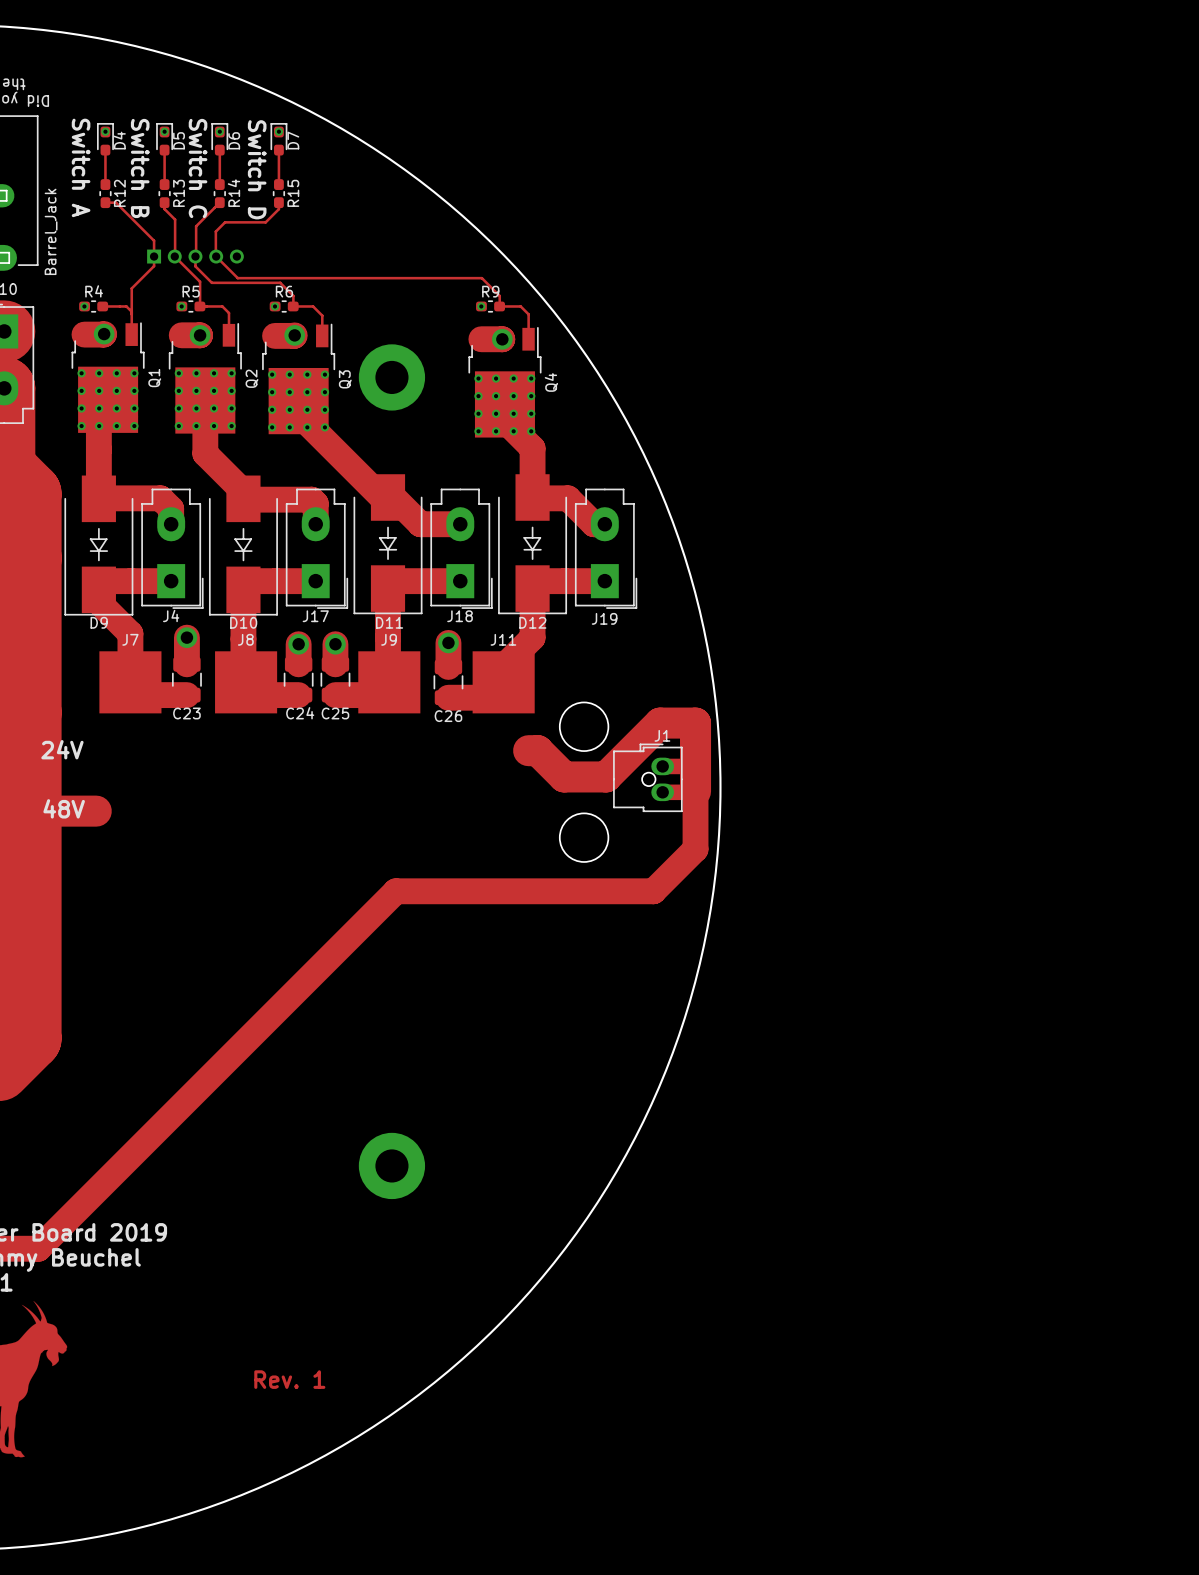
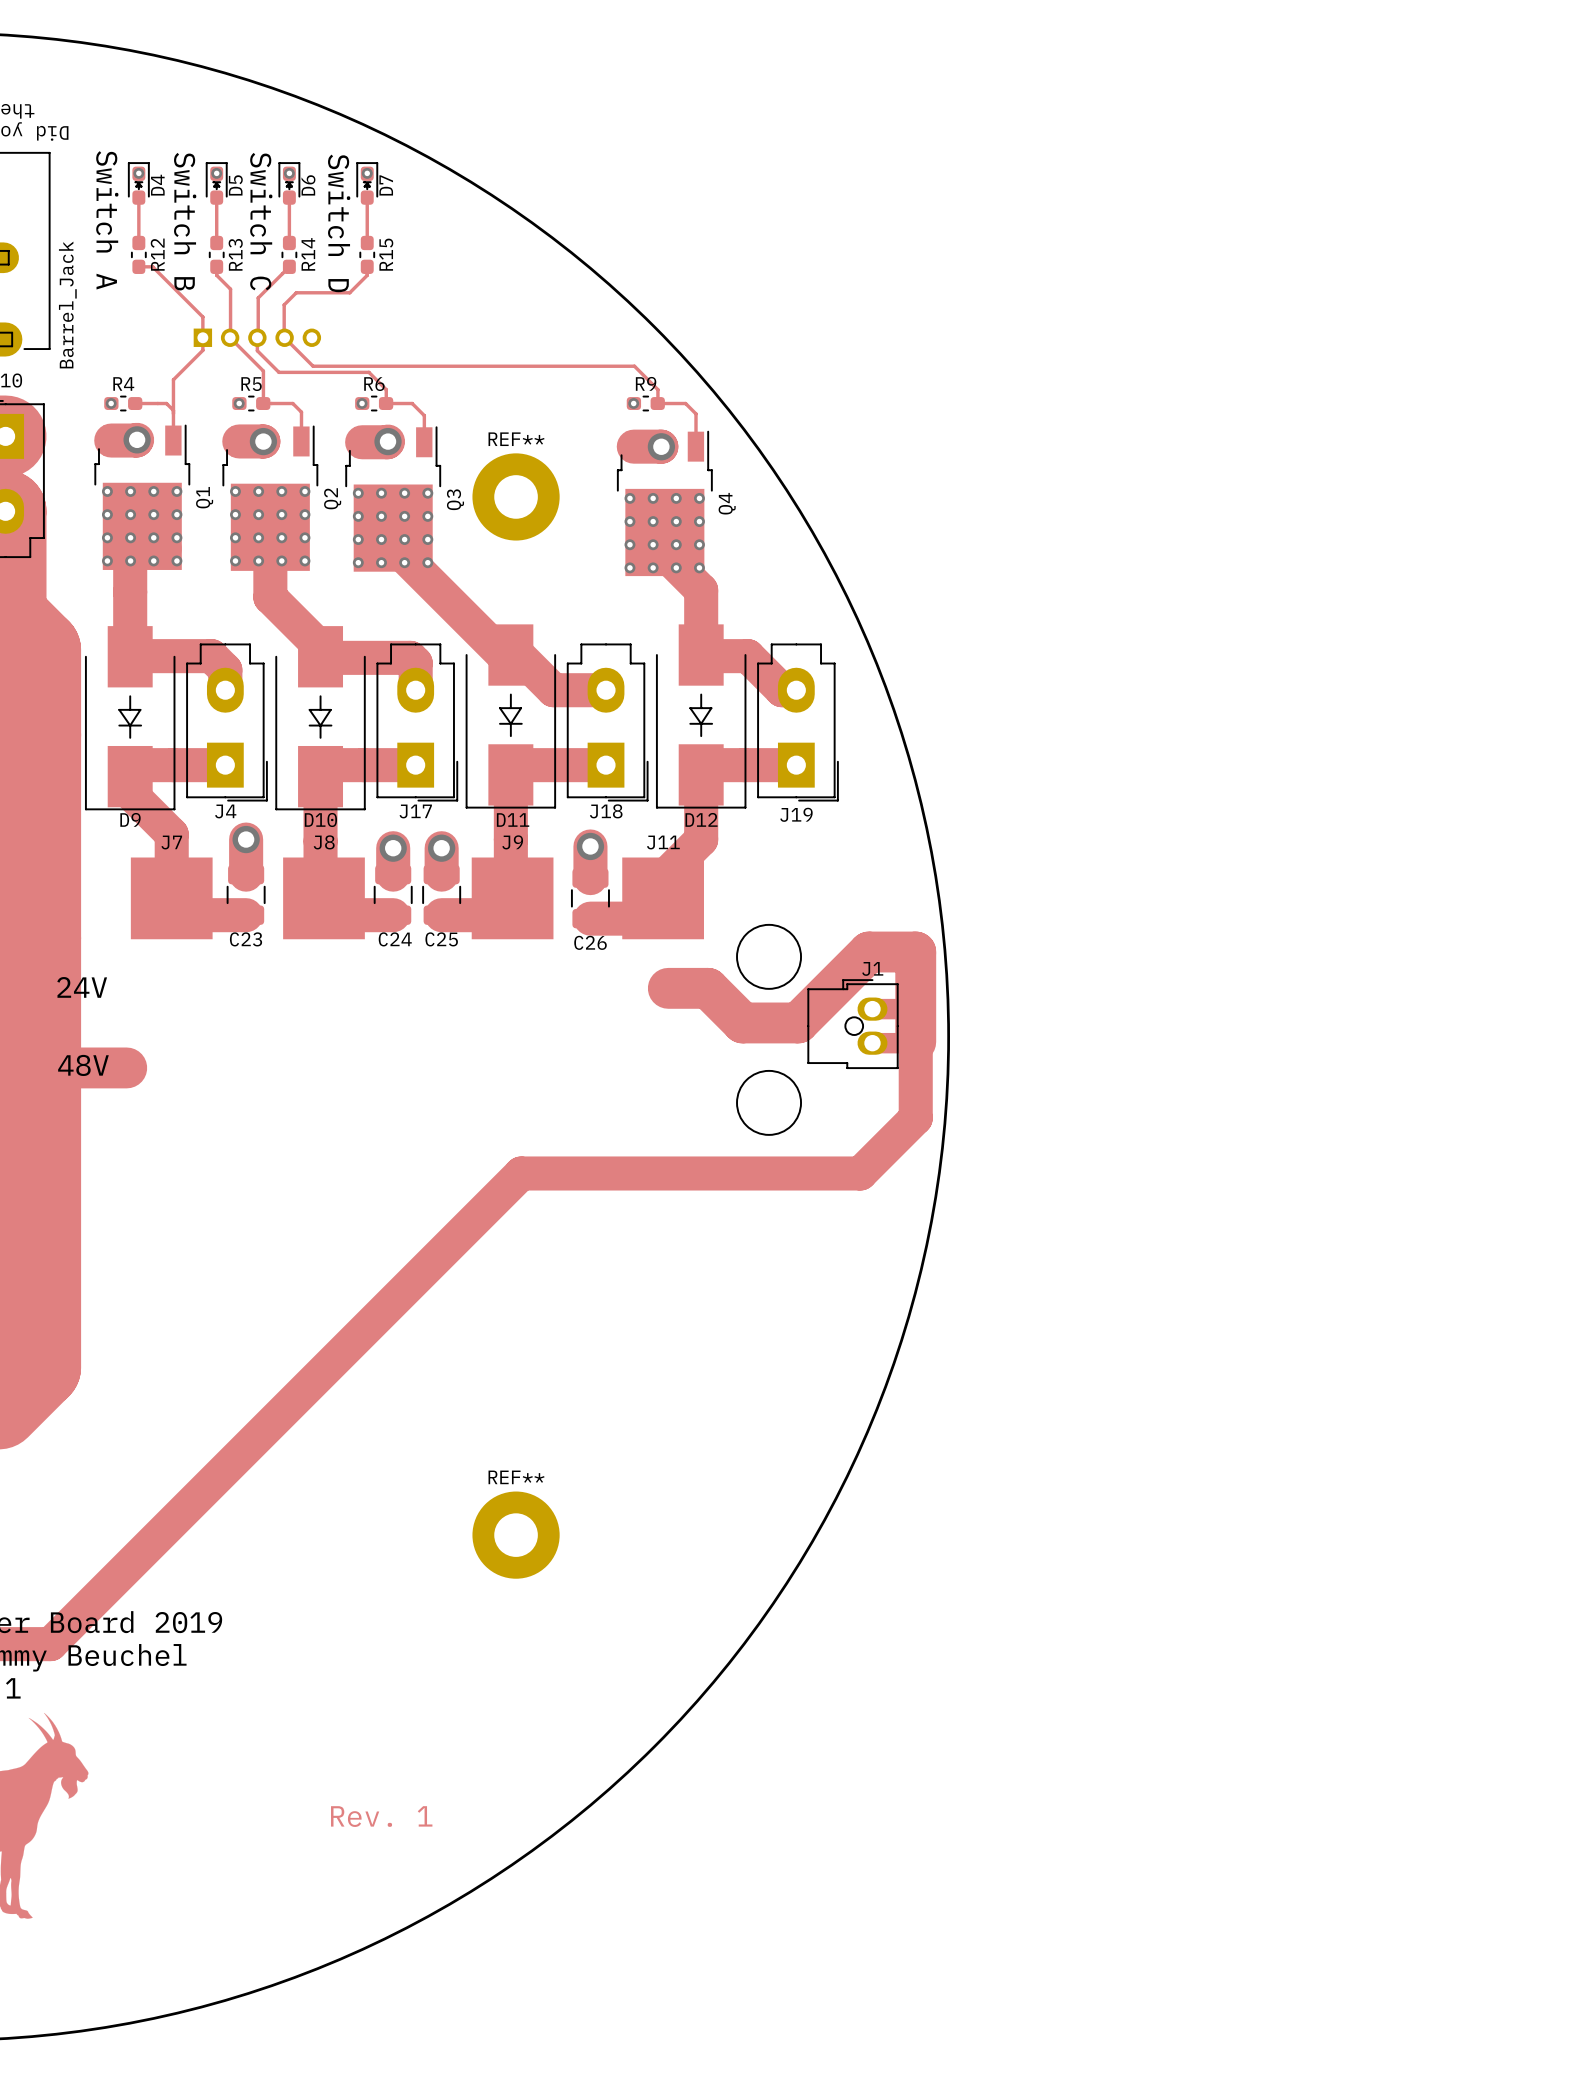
D4 footprint: [97, 123, 114, 156] -> [128, 162, 150, 205]
D5 footprint: [156, 123, 173, 156] -> [205, 162, 228, 205]
D6 footprint: [211, 123, 229, 156] -> [278, 162, 301, 205]
D7 footprint: [270, 123, 288, 156] -> [356, 162, 379, 205]
REF** name: none -> REF** (516, 439)
track: none -> (668, 988) (696, 988)
REF** name: none -> REF** (516, 1477)

